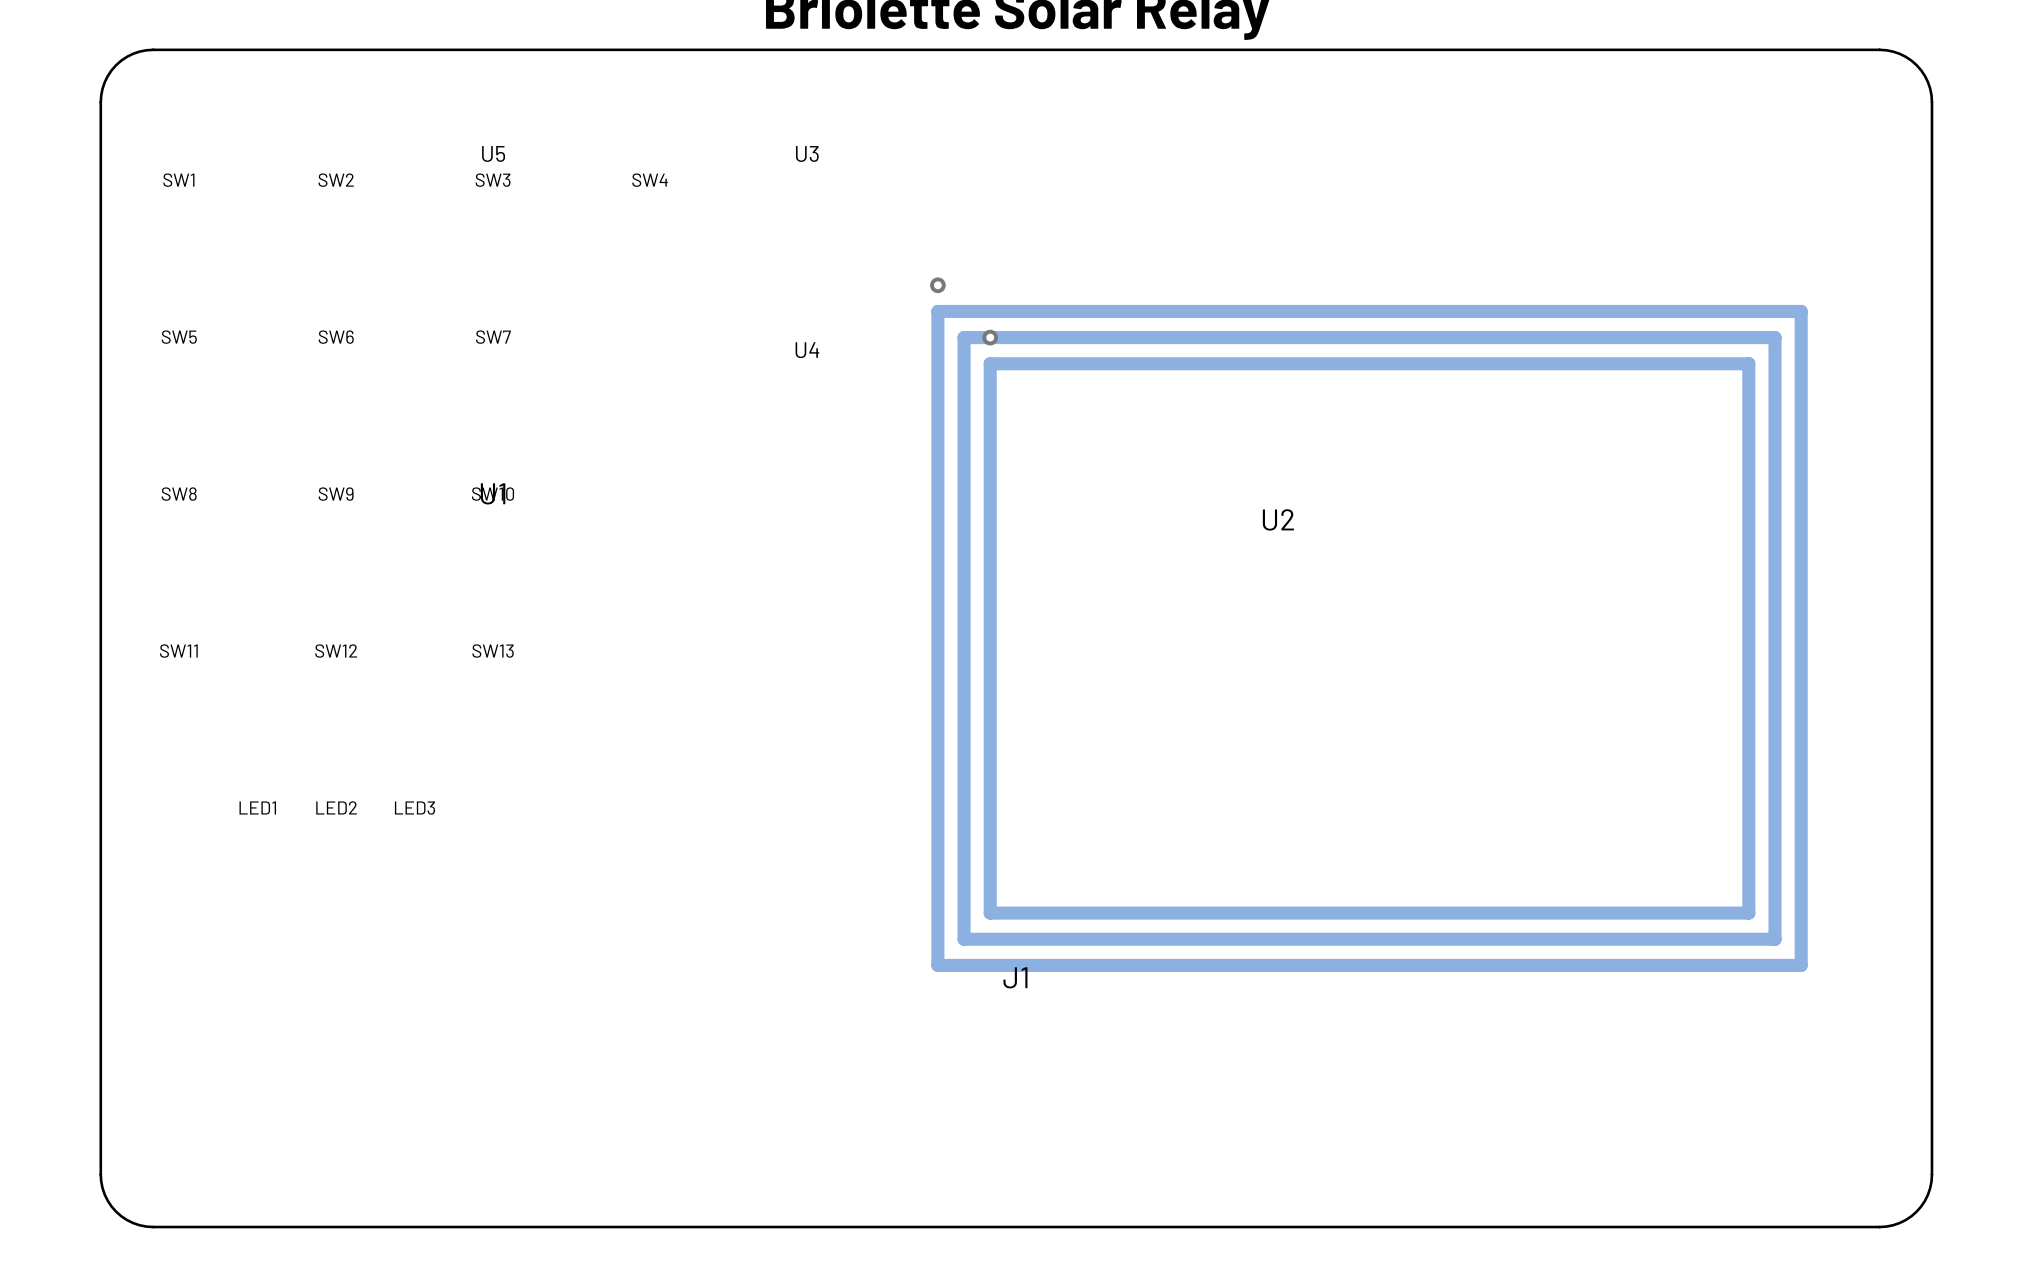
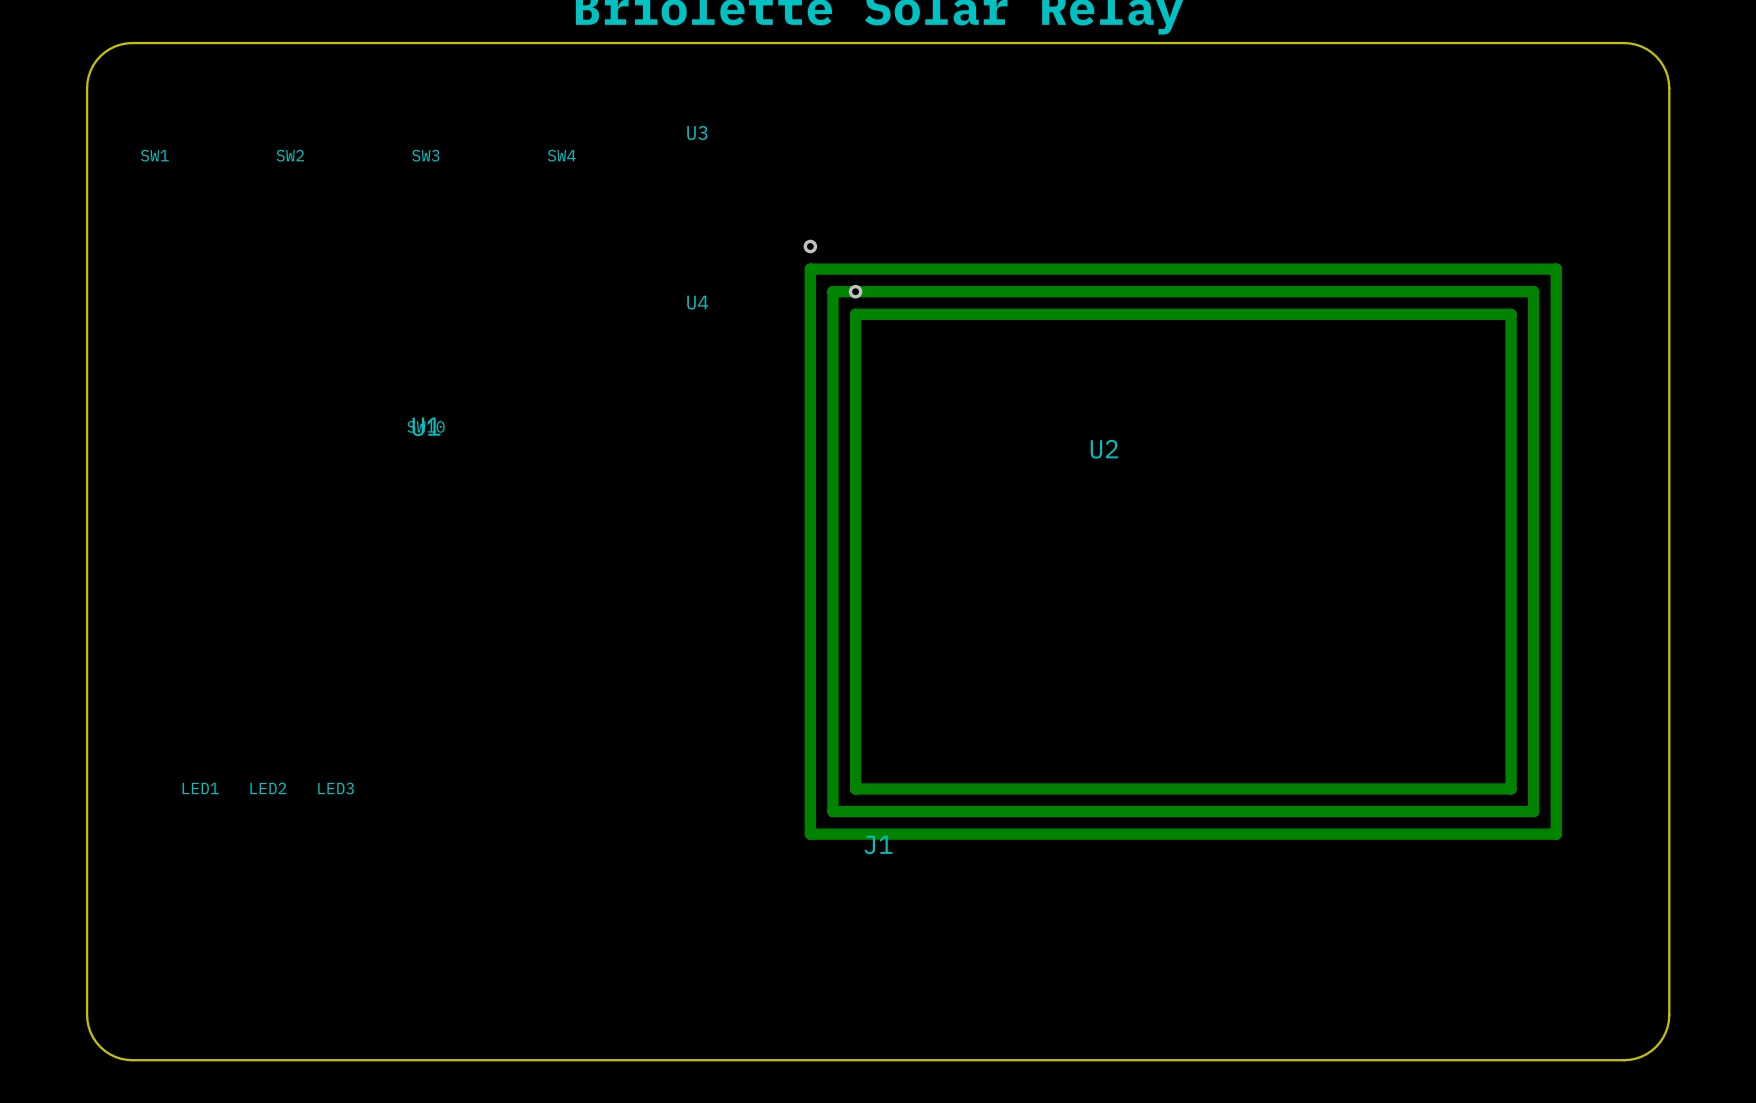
U5: (493, 153) -> none
SW5: (179, 337) -> none
SW6: (336, 337) -> none
SW7: (493, 337) -> none
SW8: (179, 494) -> none
SW9: (336, 494) -> none
SW11: (178, 651) -> none
SW12: (336, 651) -> none
SW13: (493, 651) -> none
LED1 position: (257, 807) -> (200, 788)
LED2 position: (336, 807) -> (268, 788)
LED3 position: (414, 808) -> (336, 788)

